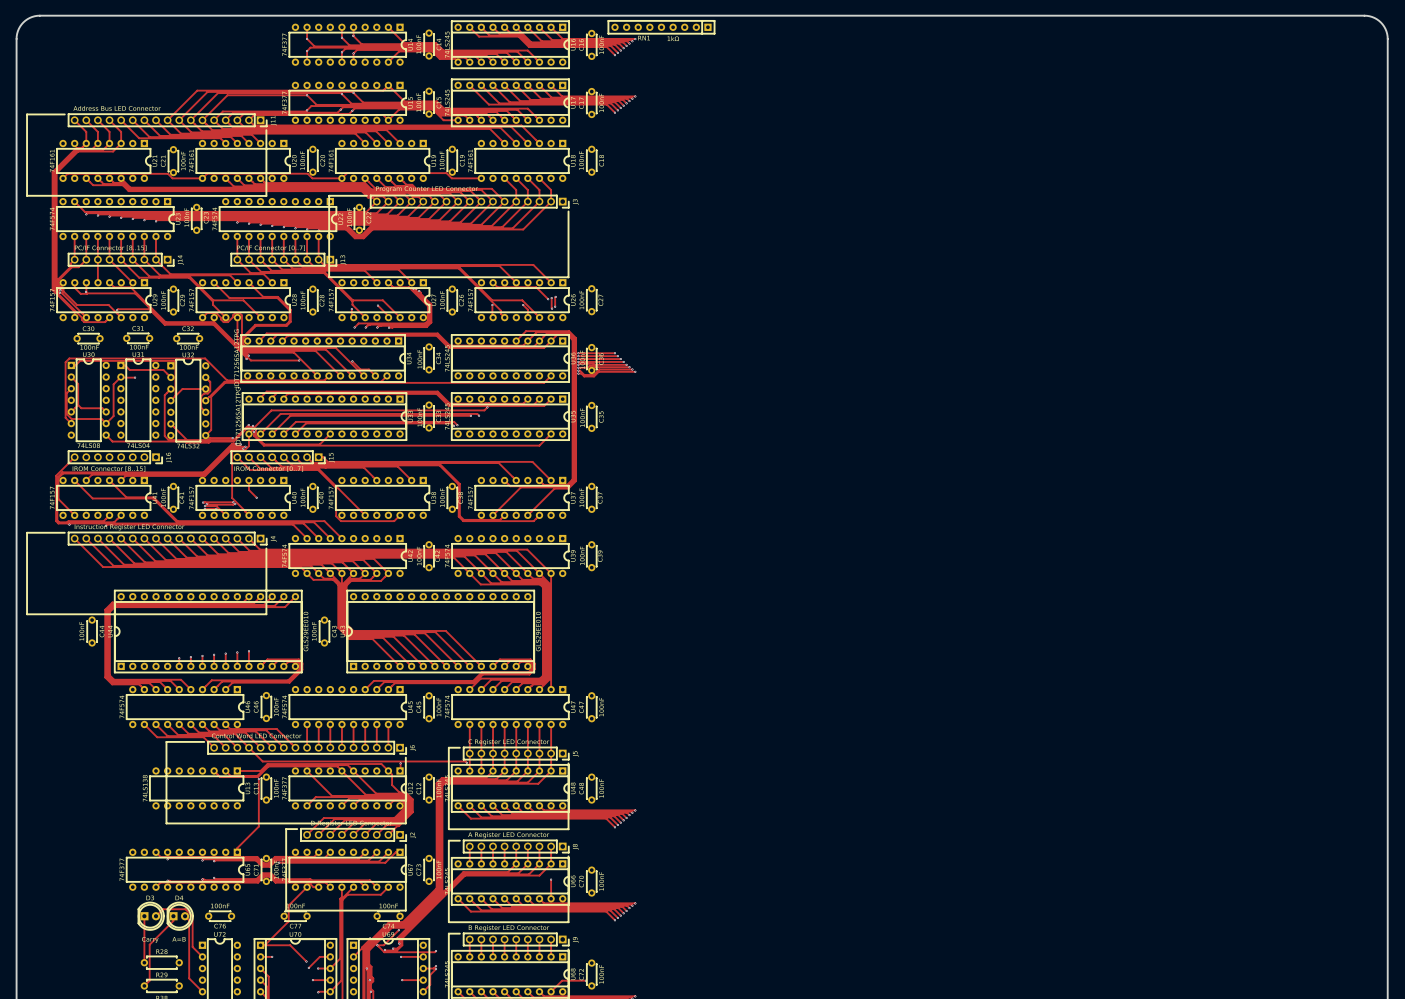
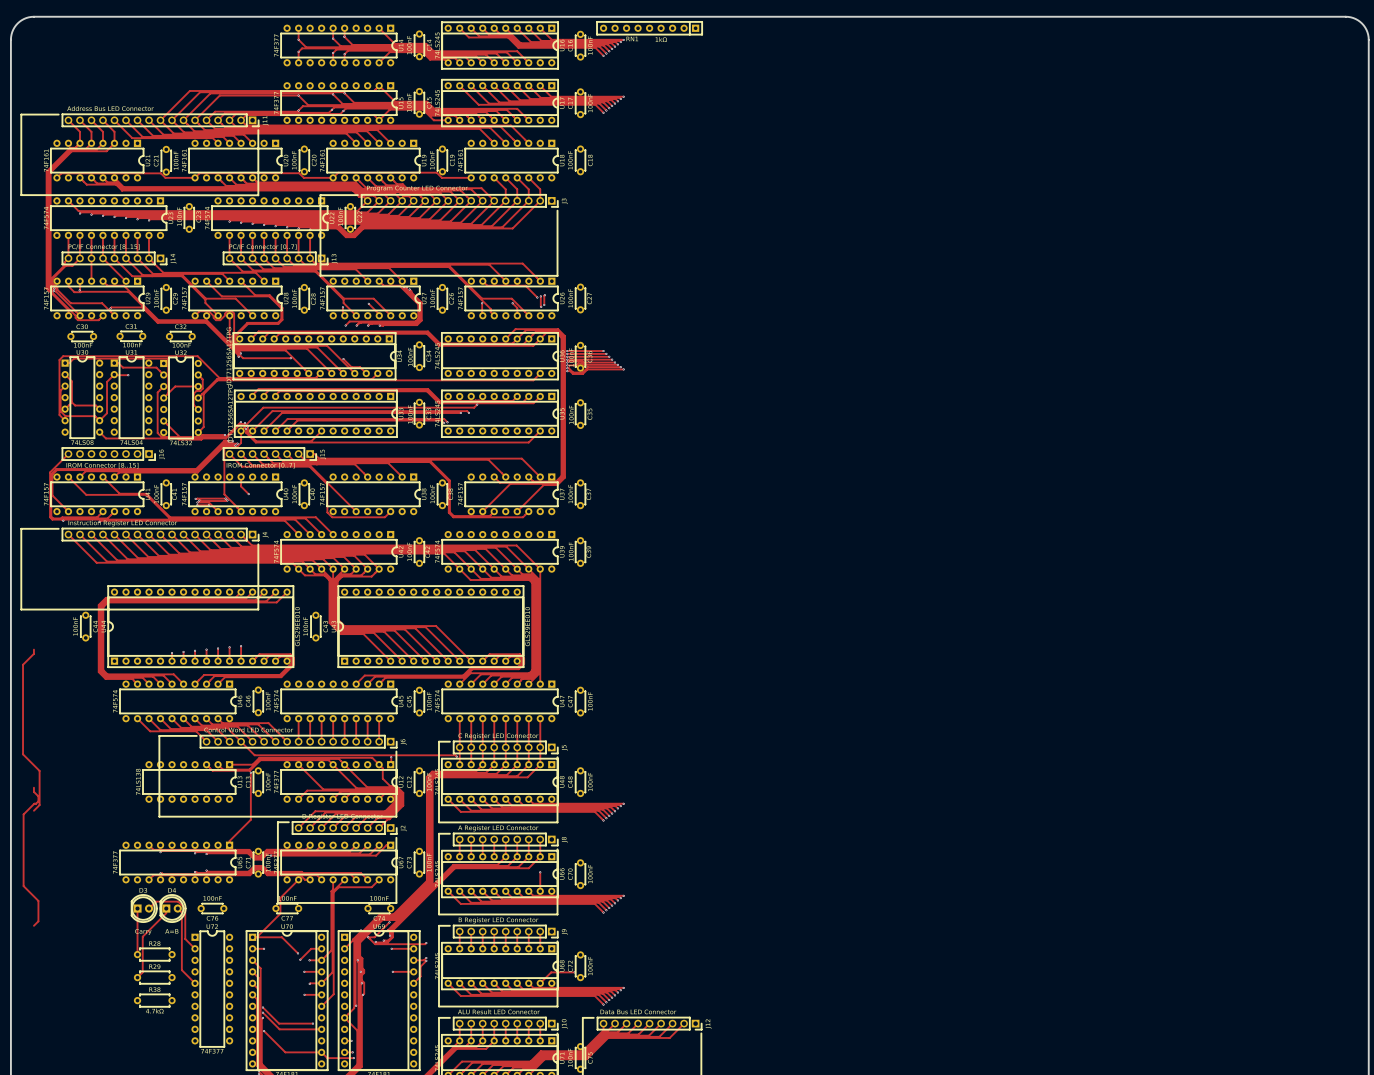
track: none -> (33, 649) (33, 653) (23, 664) (23, 754) (39, 770) (39, 805) (33, 810)
track: none -> (33, 787) (33, 791) (38, 796) (38, 801) (23, 814) (23, 886) (38, 900) (38, 921) (33, 925)

